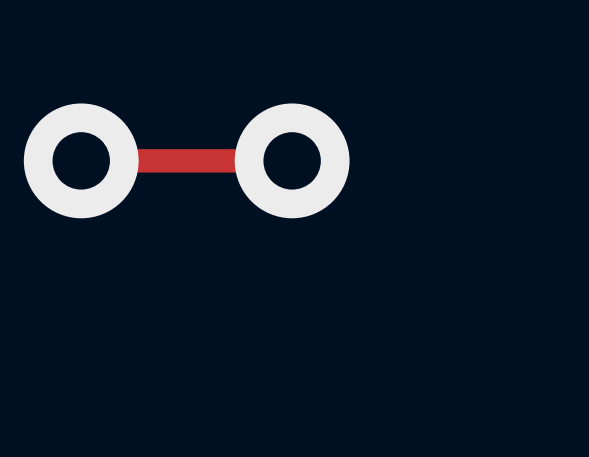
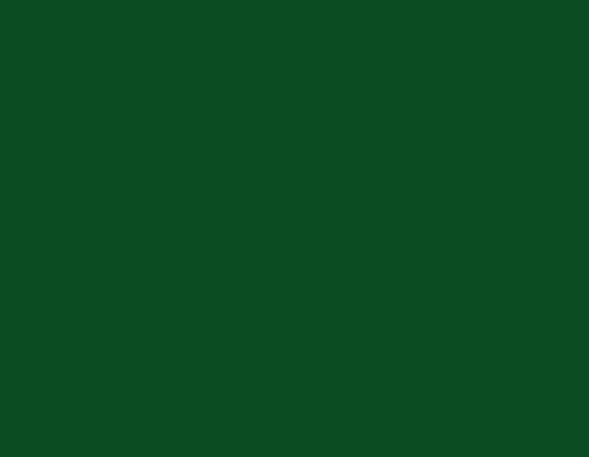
track: (81, 160) (292, 160) -> none
via: (81, 160) -> none
via: (292, 160) -> none

